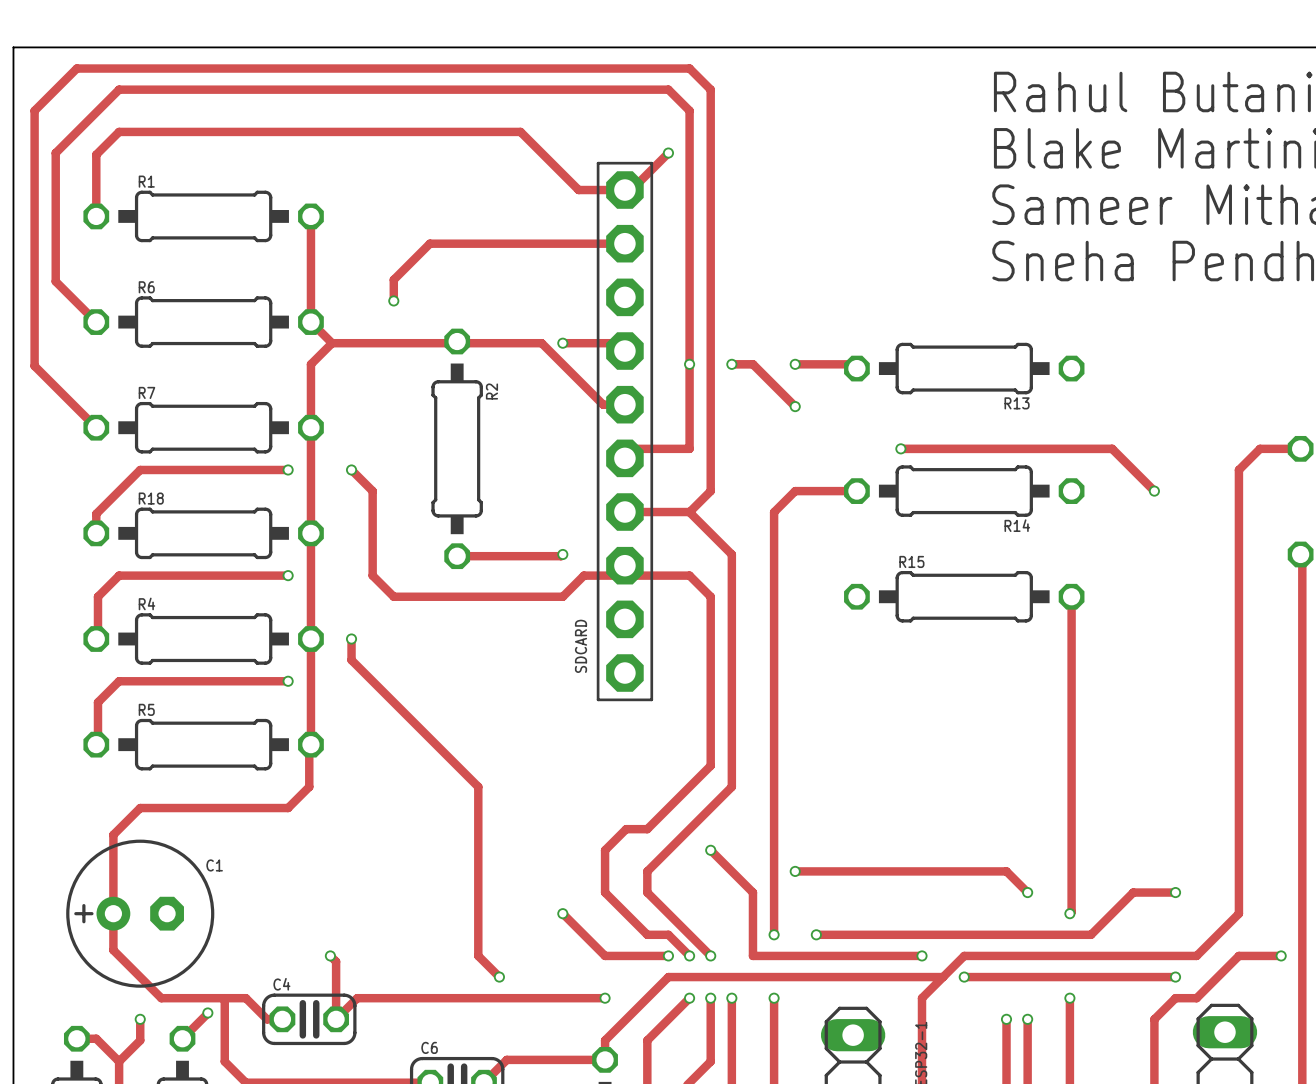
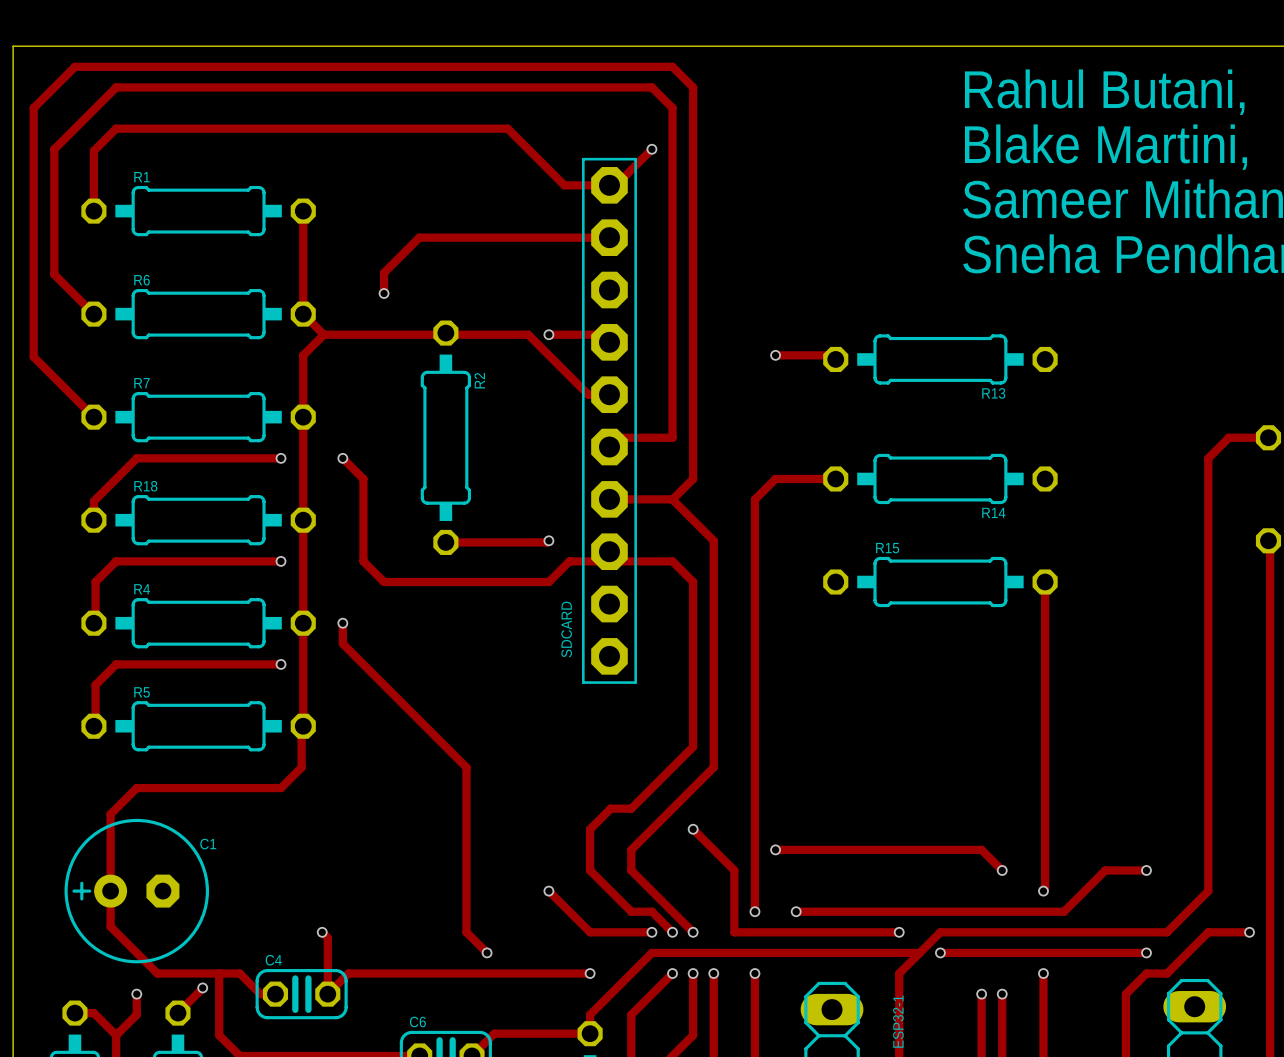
via: (689, 364) -> none
track: (731, 364) (752, 364) (795, 406) -> none
via: (731, 364) -> none
via: (795, 406) -> none
track: (900, 448) (1112, 448) (1154, 491) -> none
via: (900, 448) -> none
via: (1154, 491) -> none

